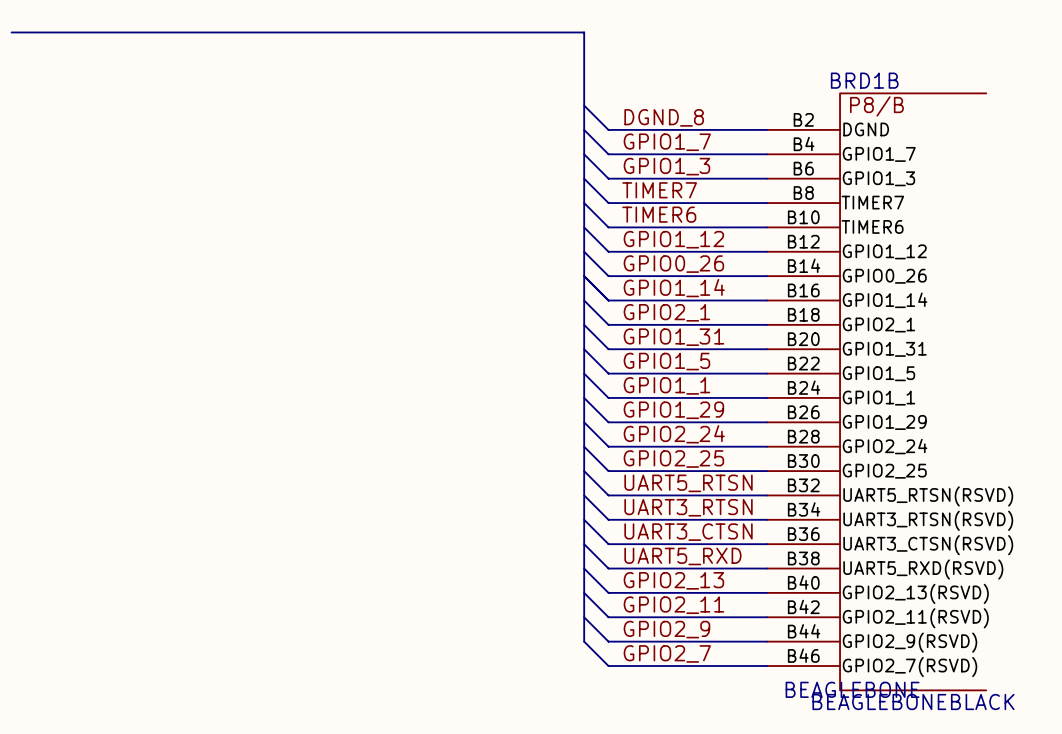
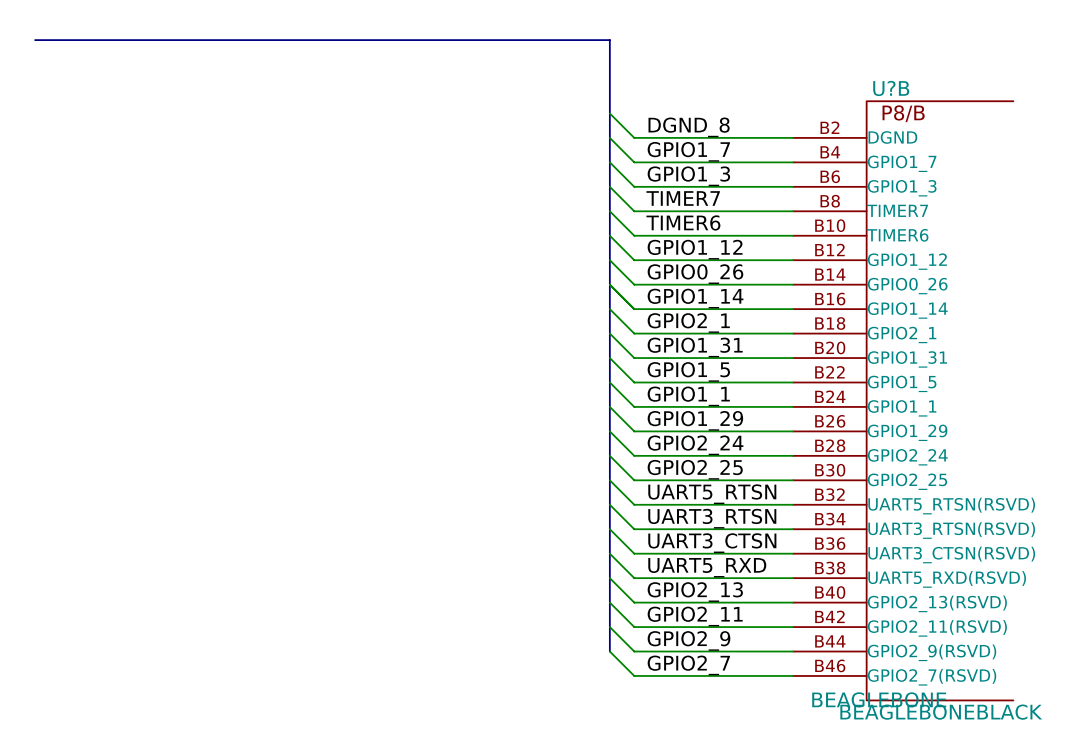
BRD1B name: BRD1B (864, 80) -> U?B (891, 88)

